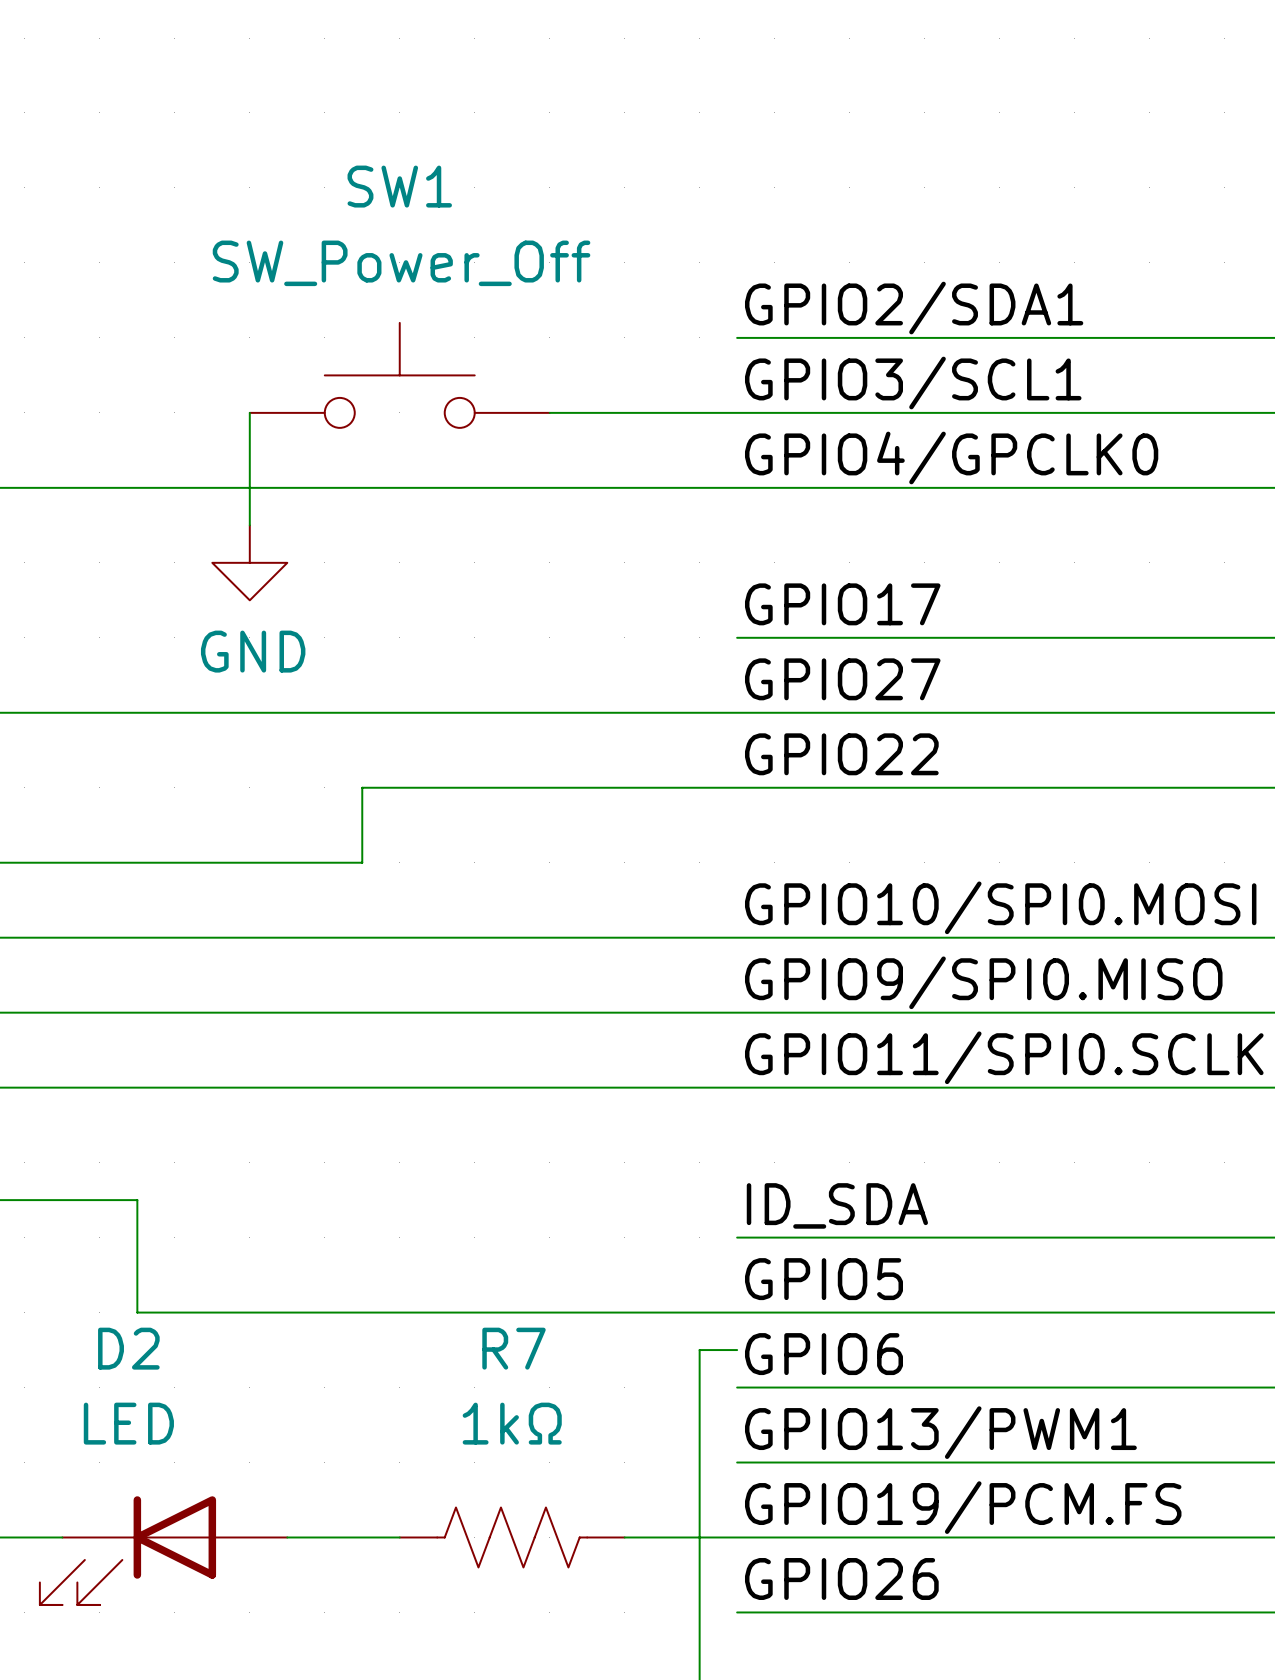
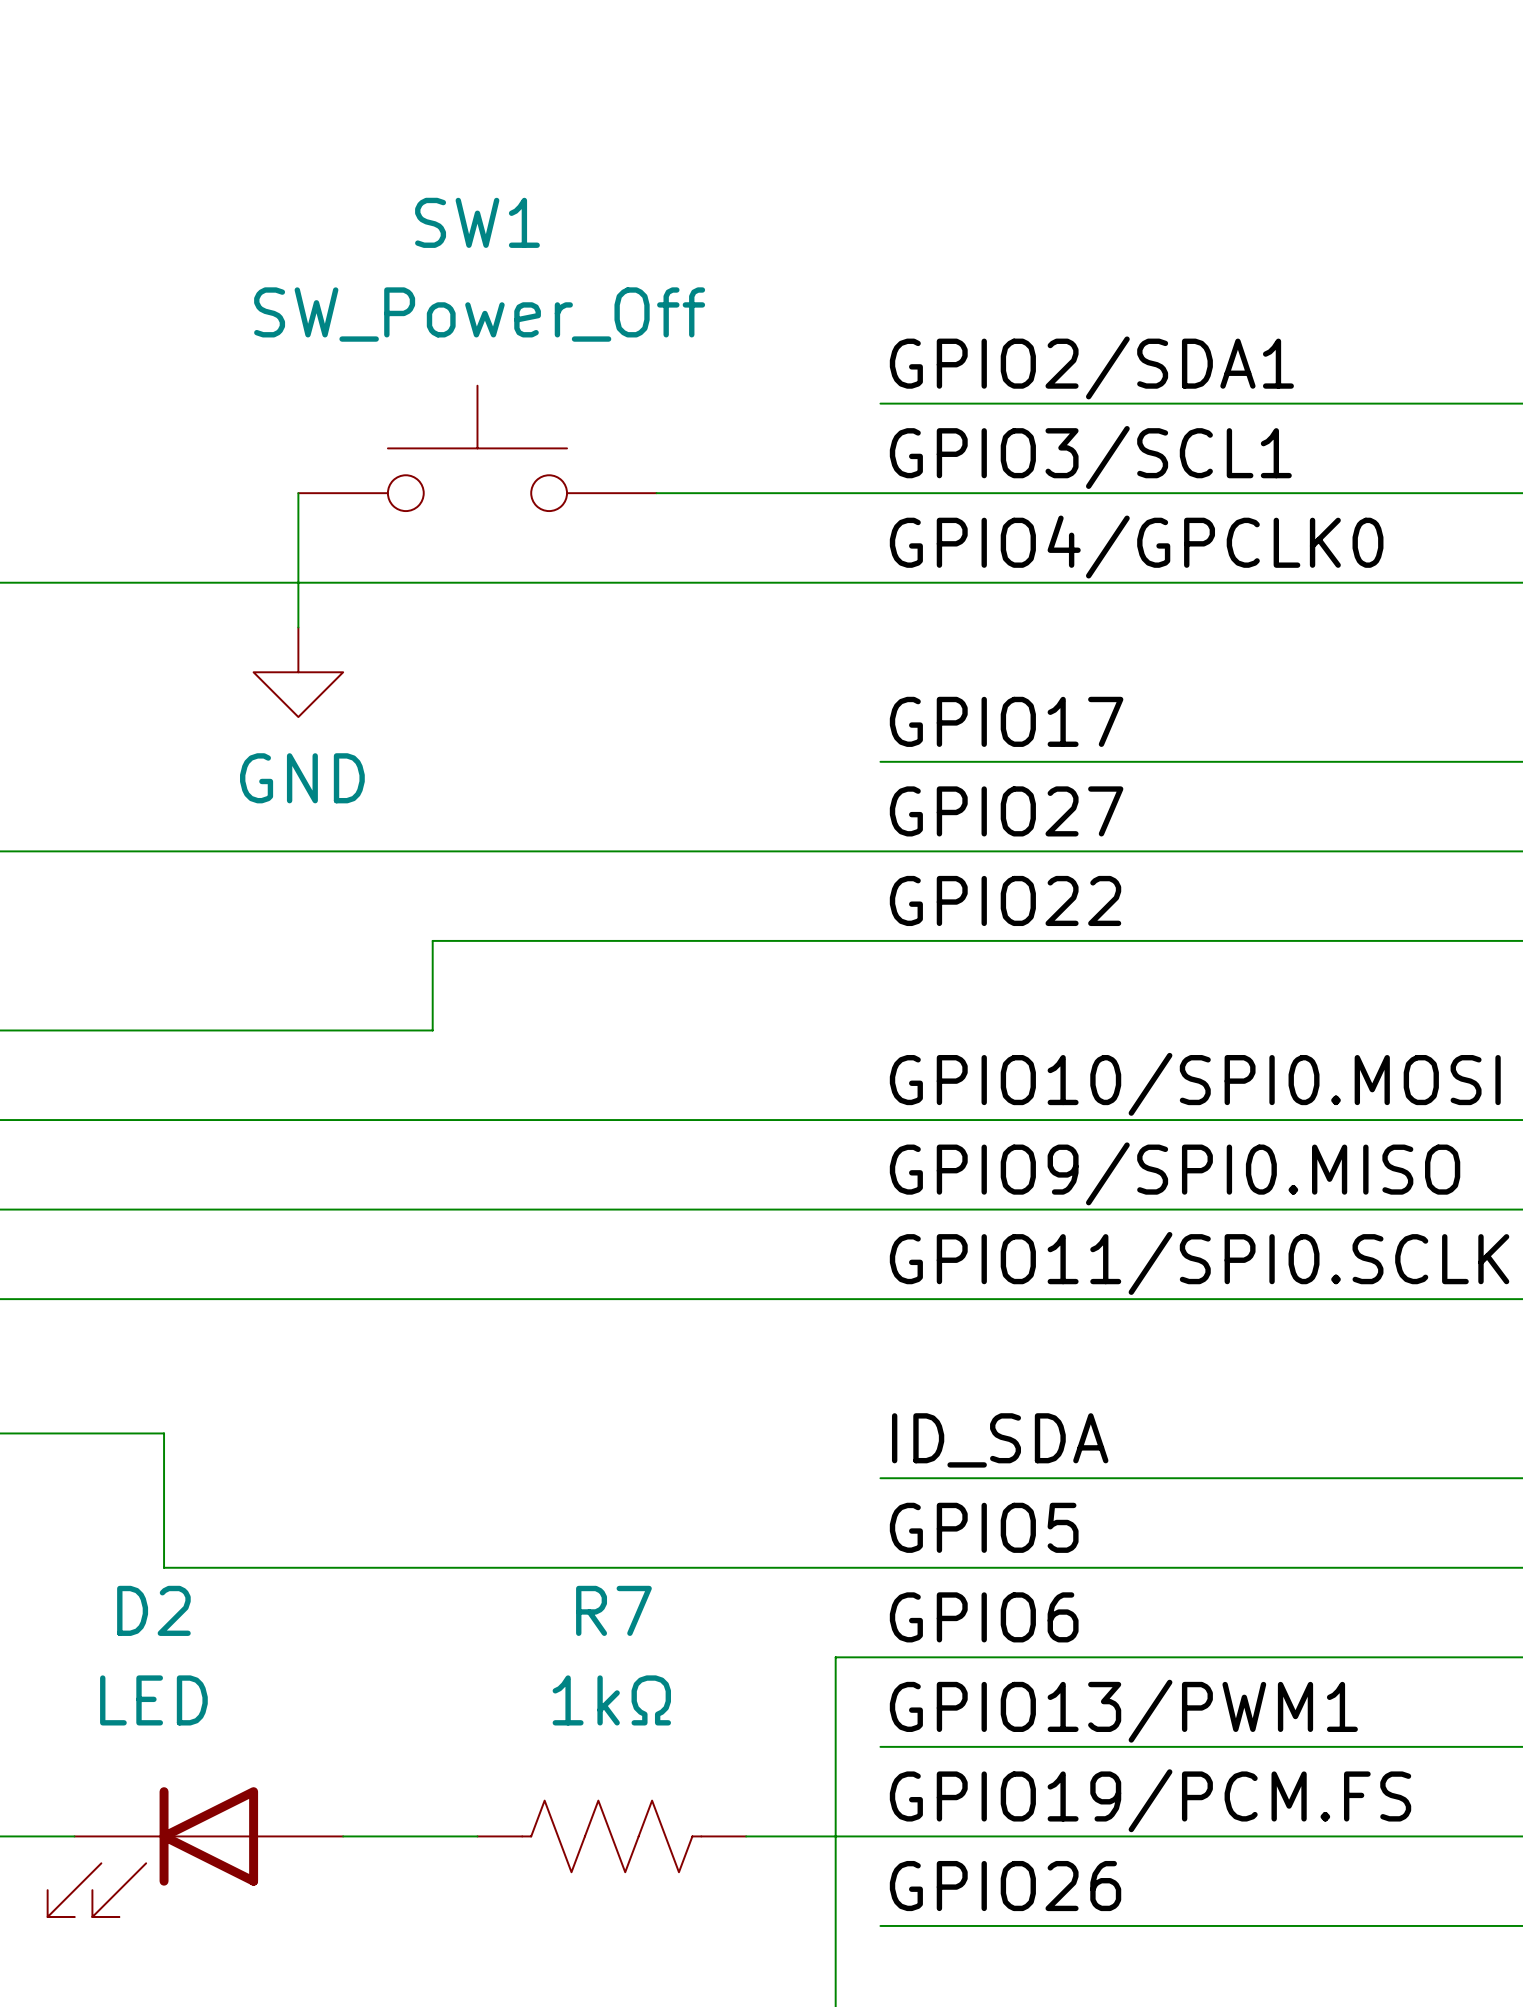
wire: (737, 1350) (699, 1350) (699, 1387) -> (880, 1657) (835, 1657)

